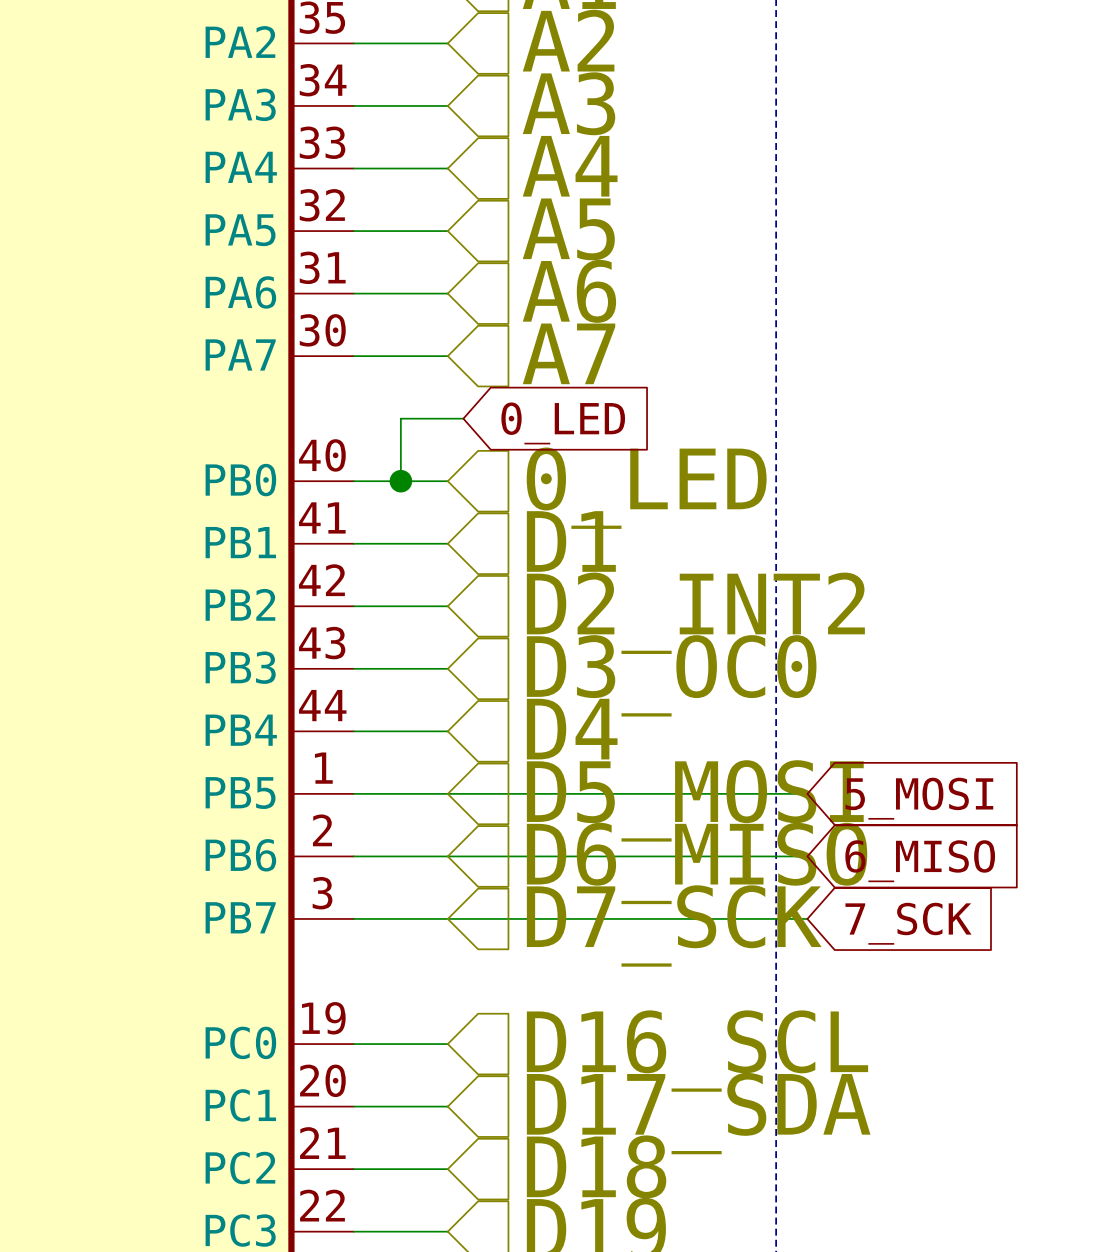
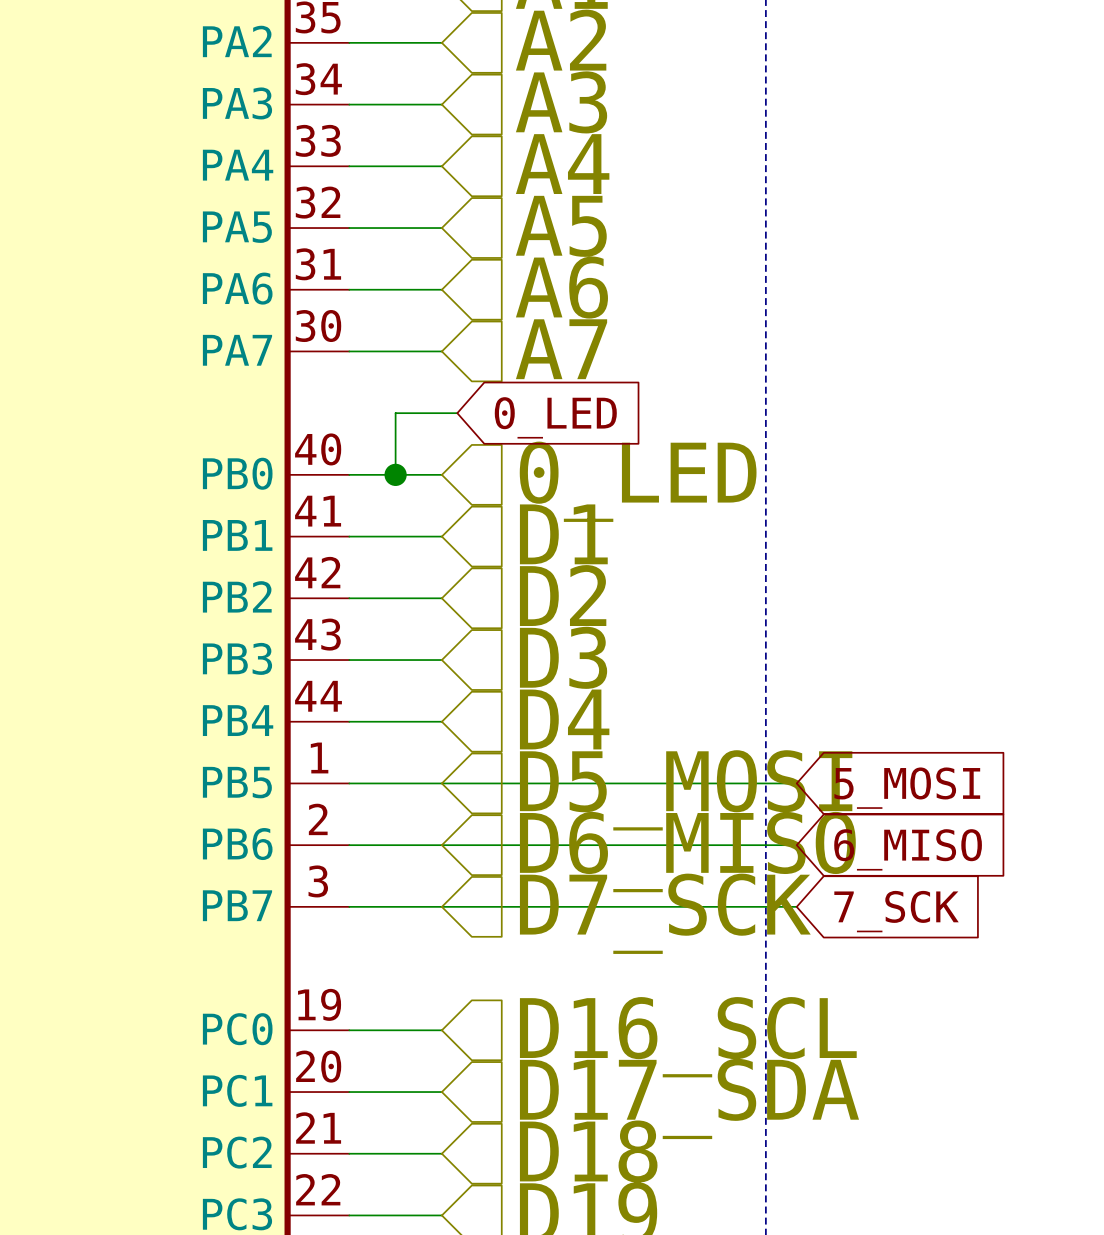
hierarchical label: D2_INT2 (695, 613) -> D2 (563, 595)
hierarchical label: D3_OC0 (671, 675) -> D3 (563, 657)

